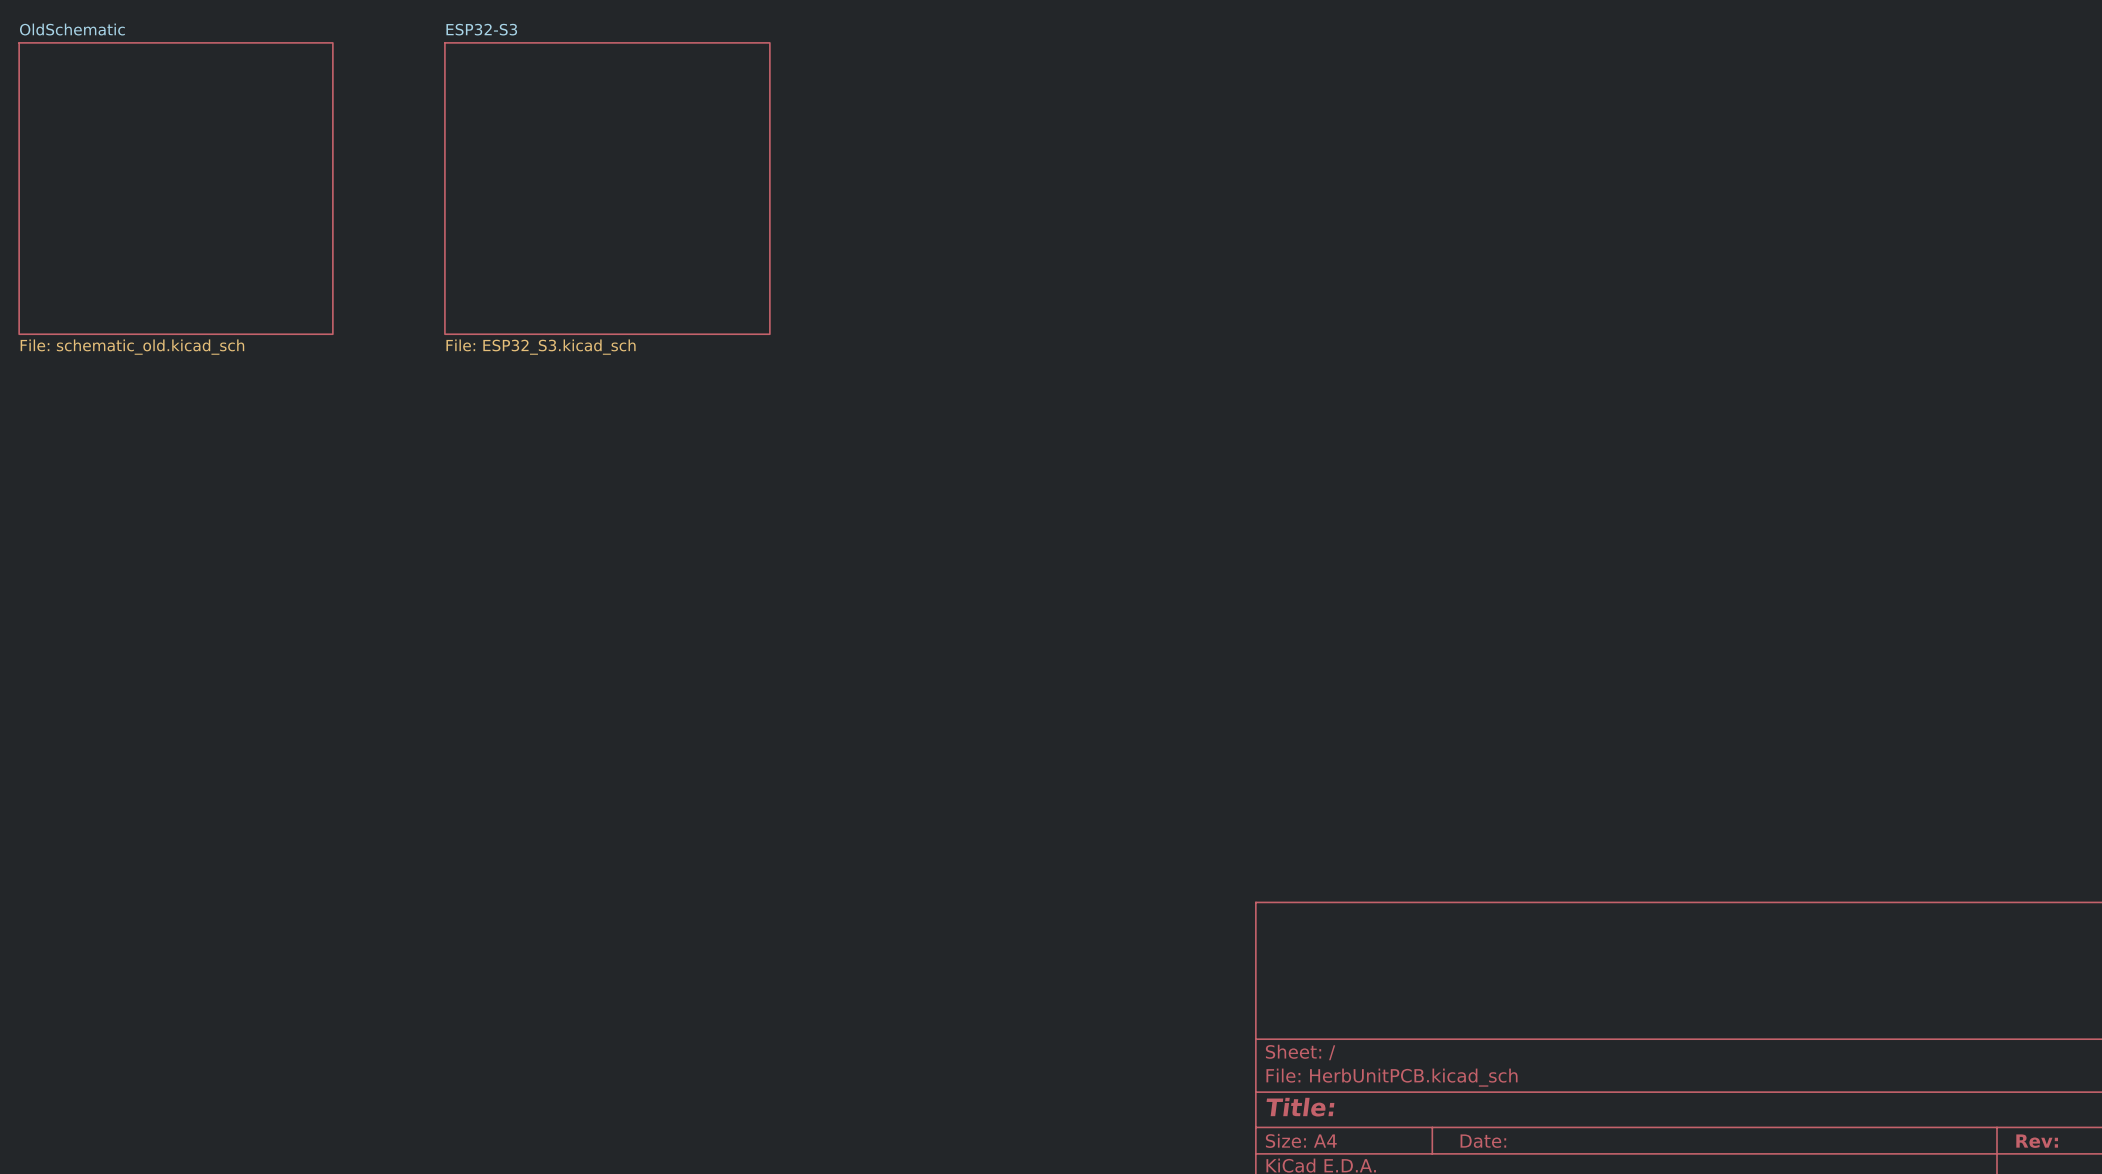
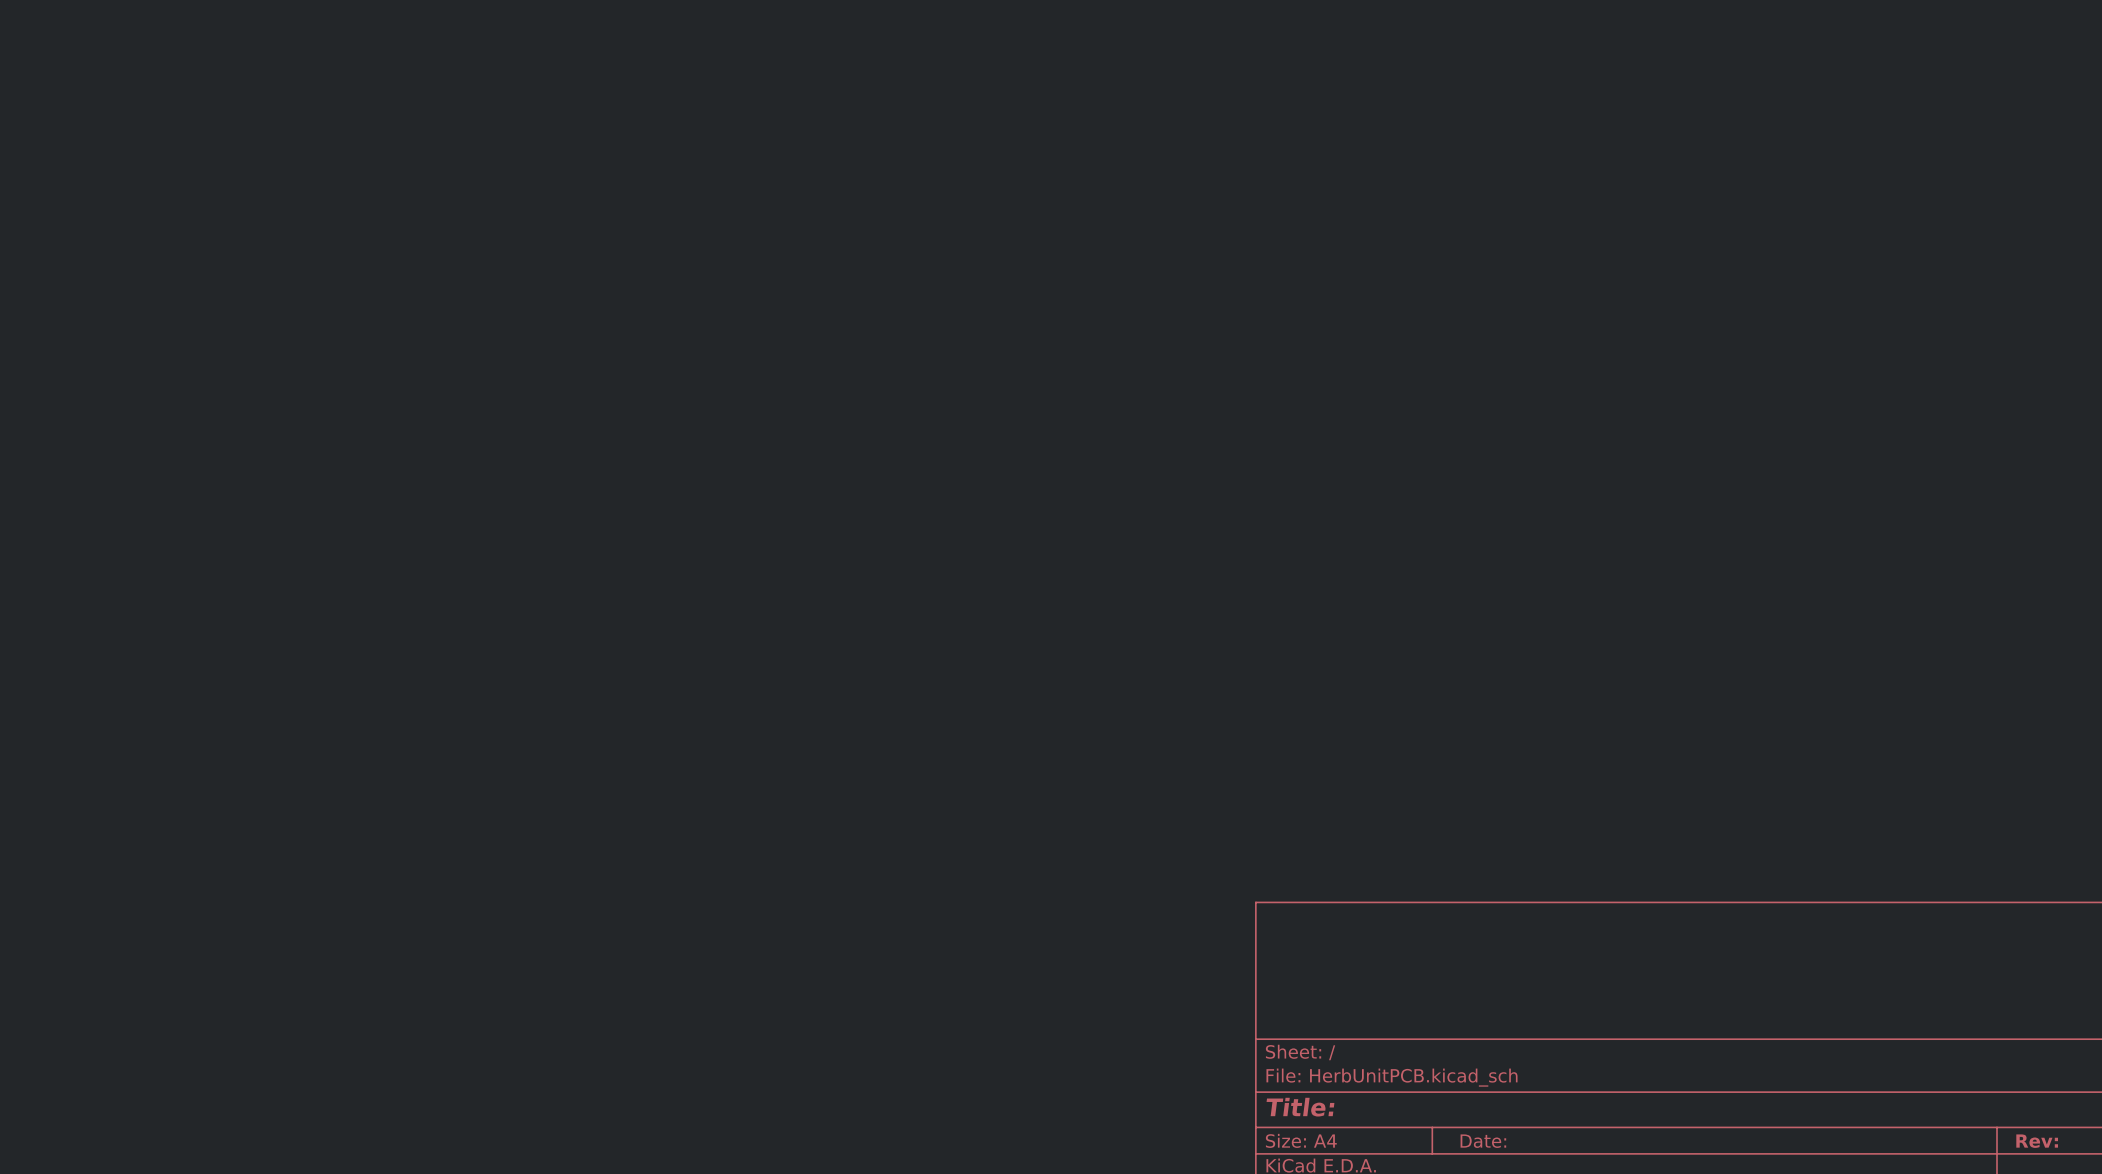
sheet OldSchematic: File: schematic_old.kicad_sch (176, 188) -> none
sheet ESP32-S3: File: ESP32_S3.kicad_sch (607, 188) -> none

